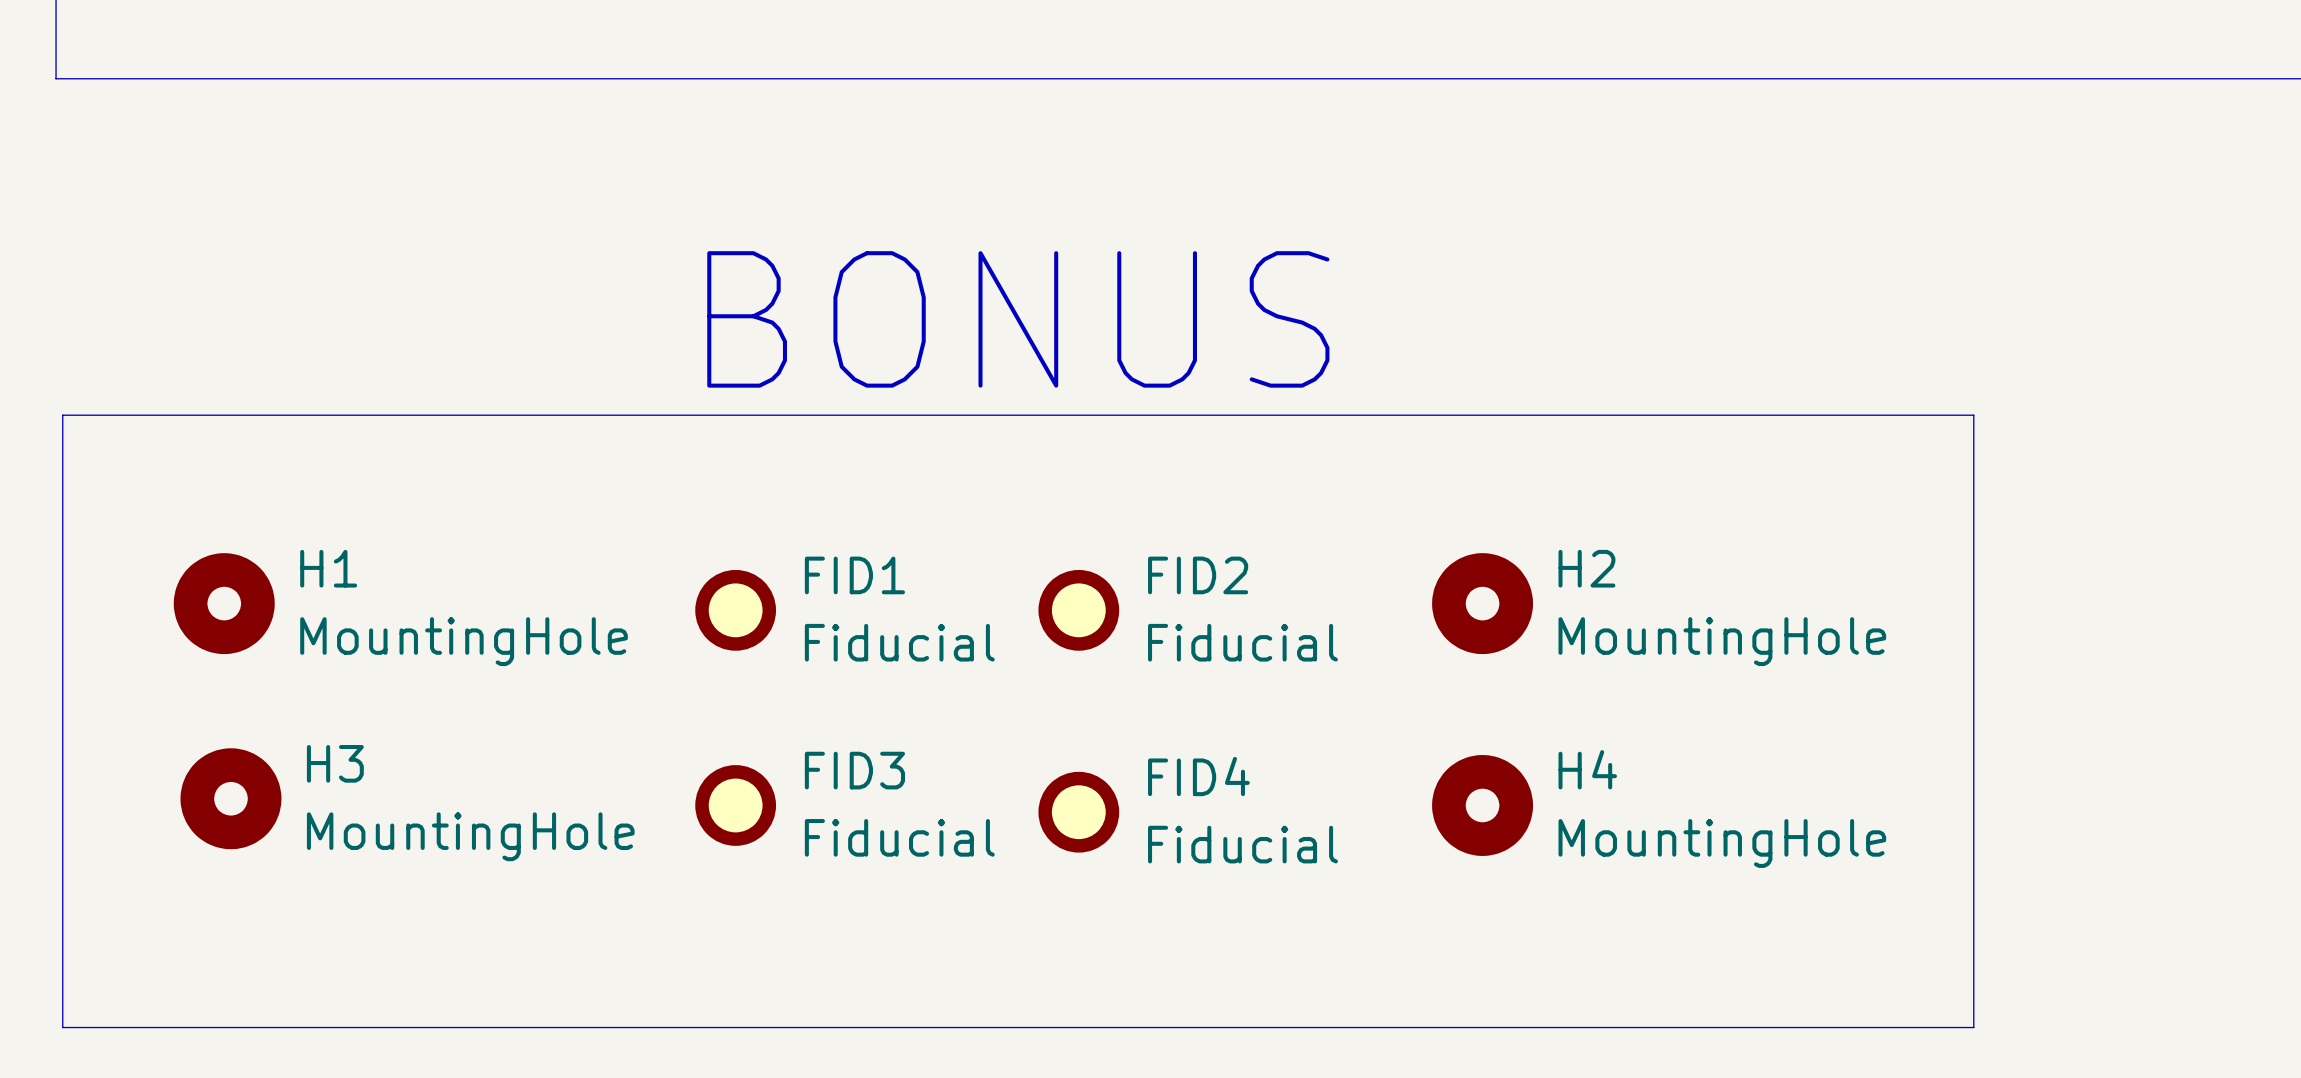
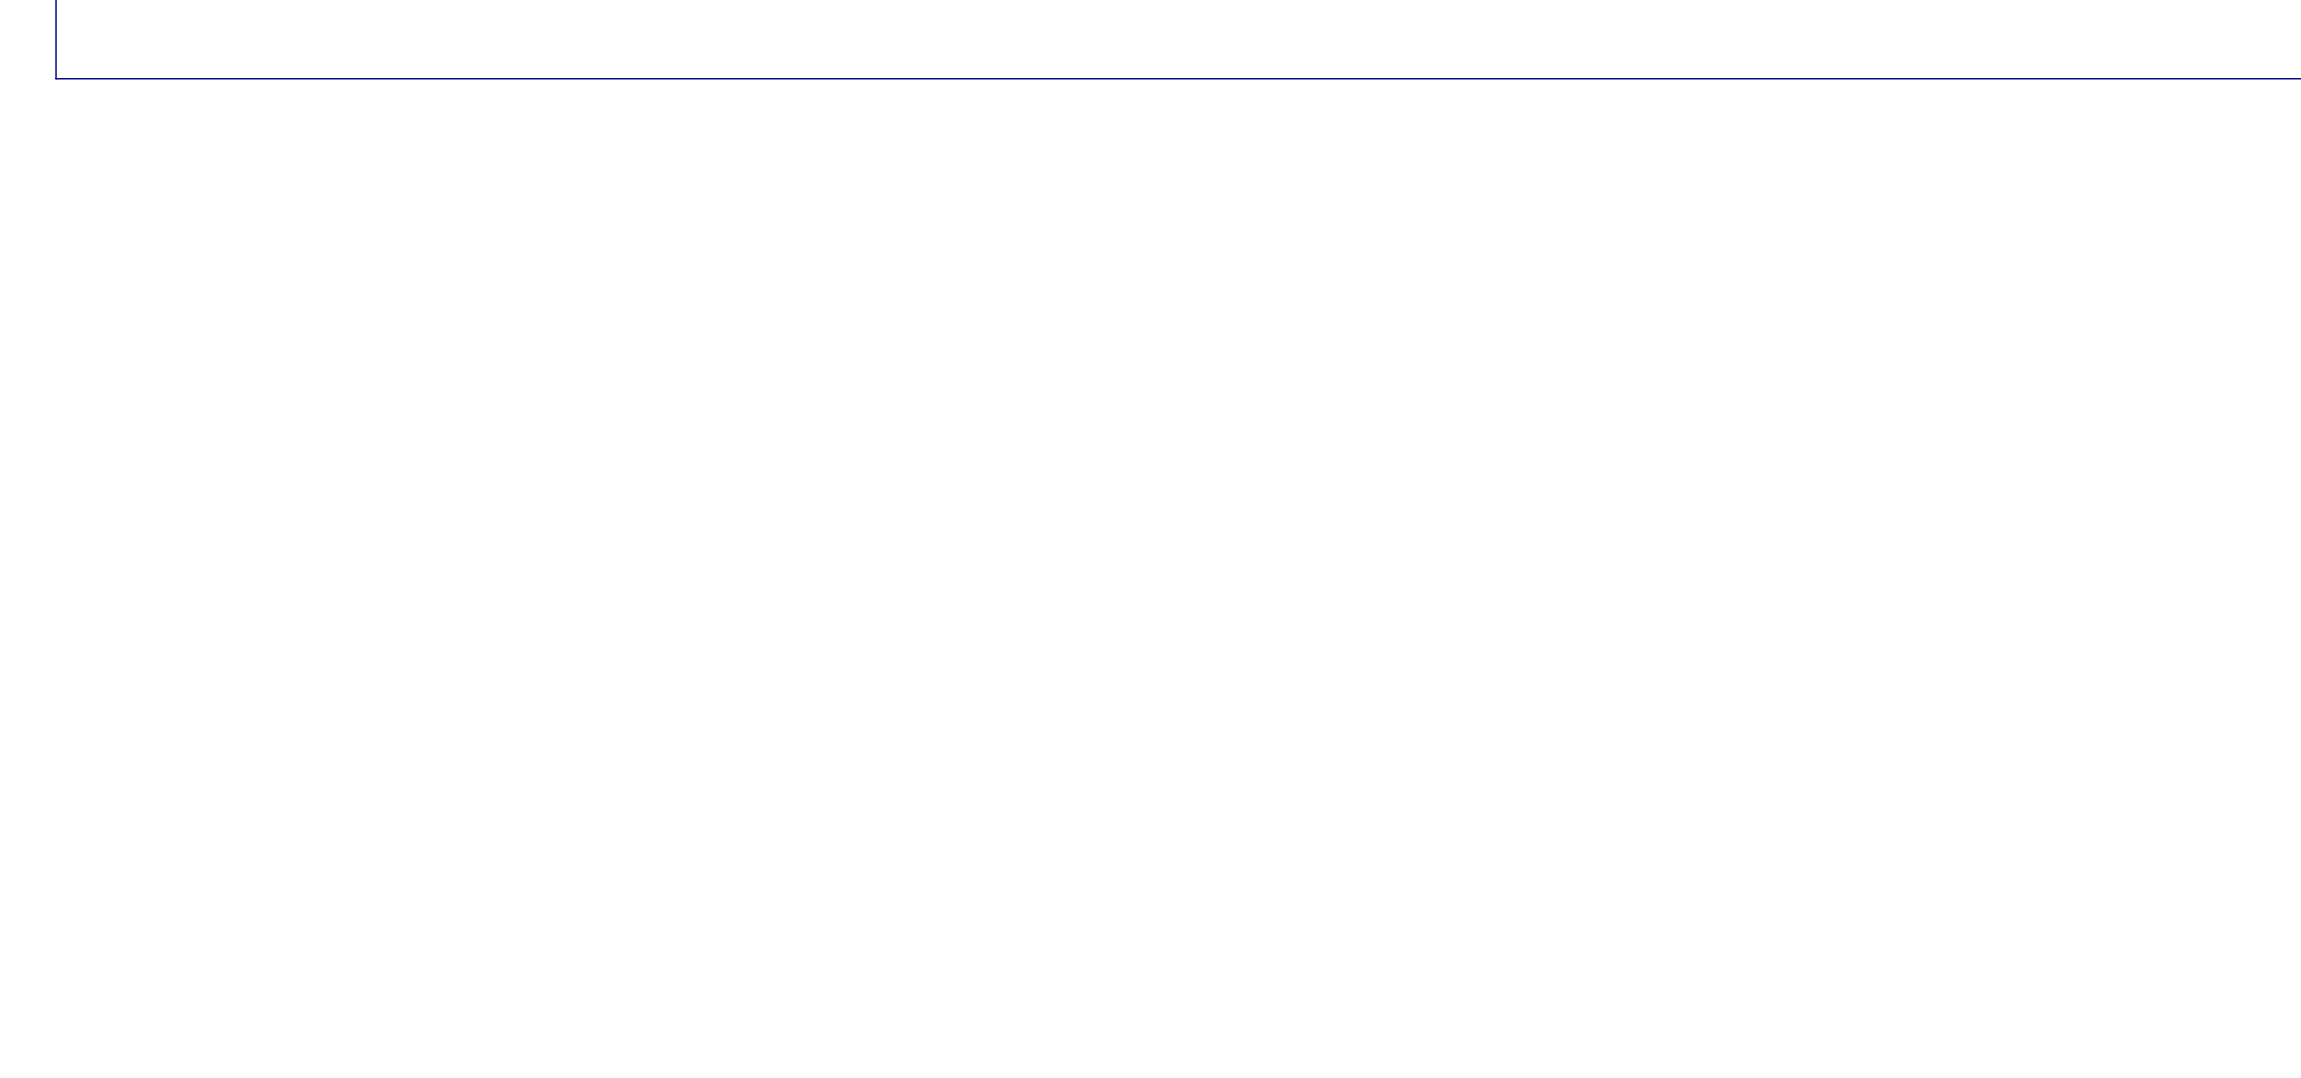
text: BONUS (1018, 319) -> none
line: (62, 415) (1973, 415) (1973, 1027) (62, 1027) (62, 415) -> none
H1: MountingHole (224, 603) -> none
H2: MountingHole (1482, 603) -> none
FID1: Fiducial (735, 610) -> none
FID2: Fiducial (1078, 610) -> none
H3: MountingHole (230, 798) -> none
FID3: Fiducial (735, 805) -> none
H4: MountingHole (1482, 805) -> none
FID4: Fiducial (1078, 812) -> none

